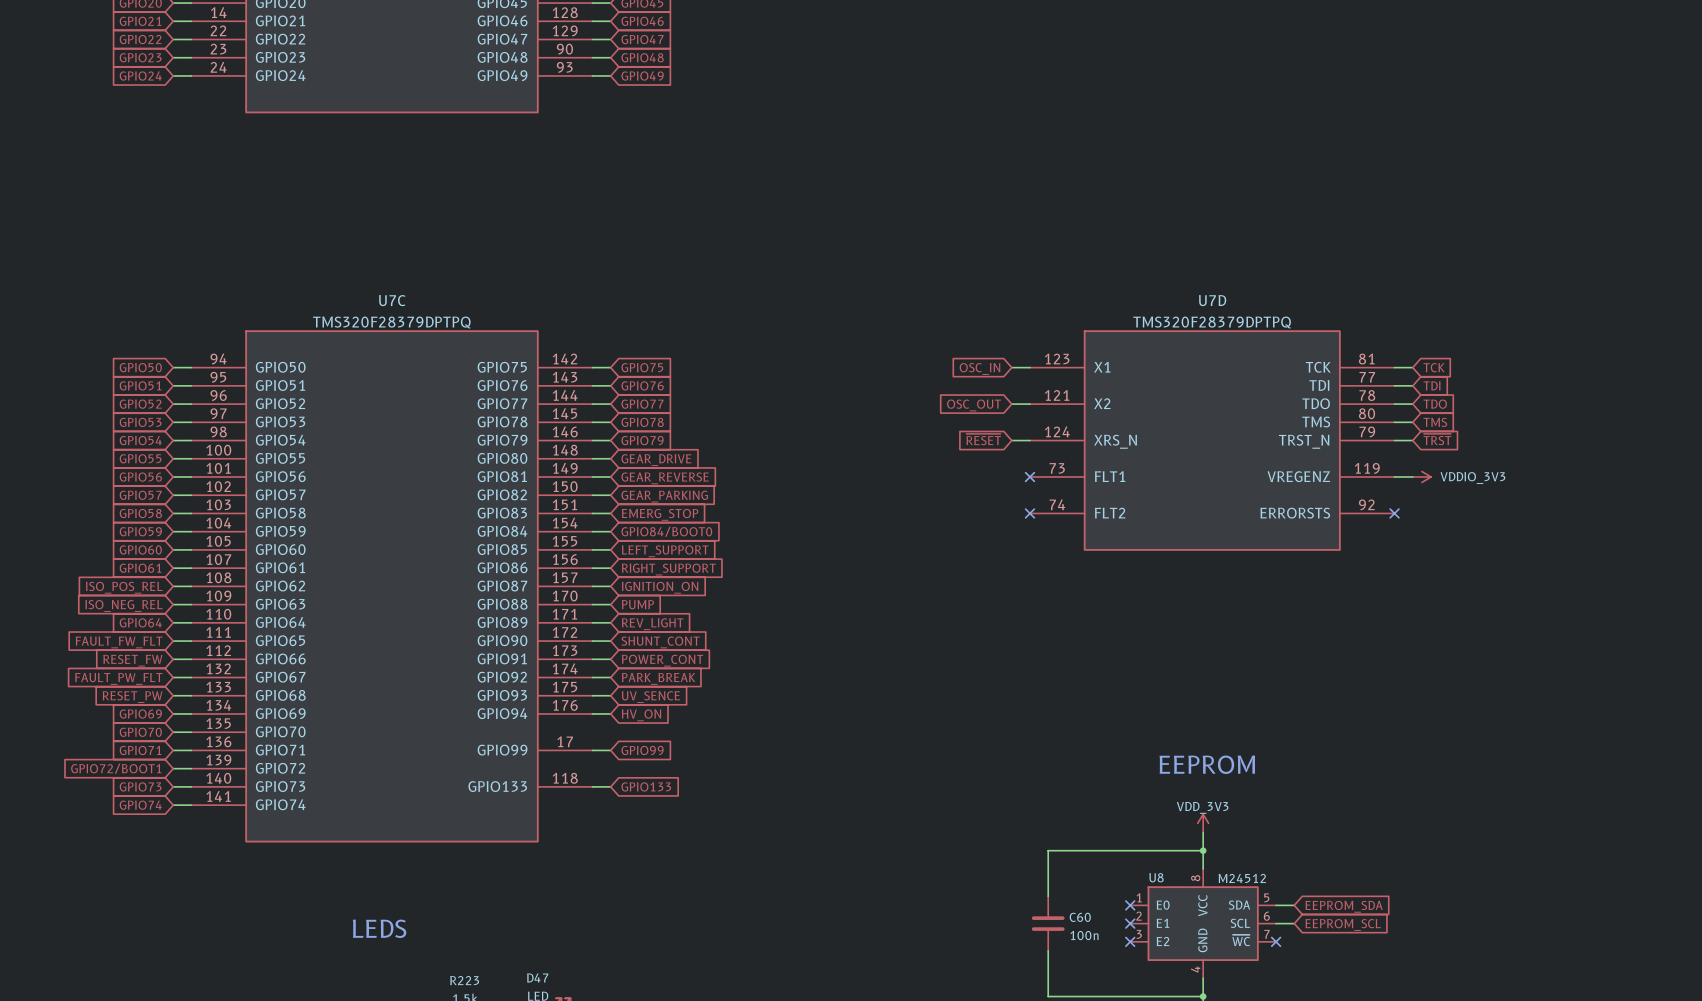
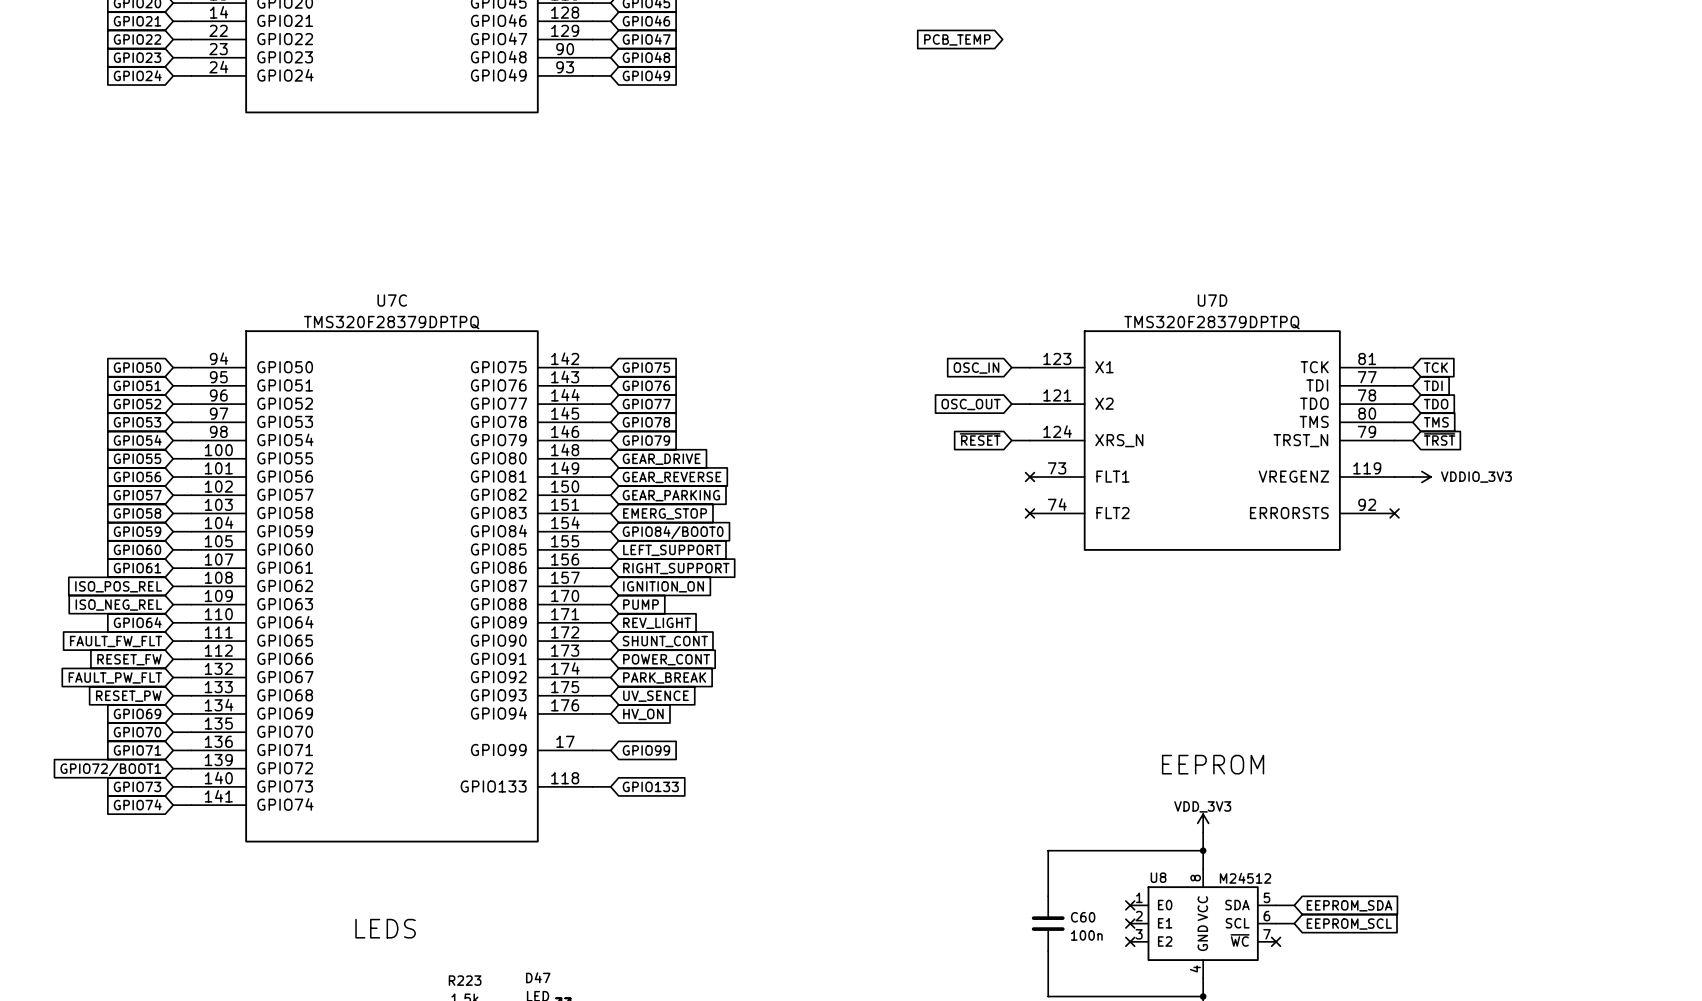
global label: none -> PCB_TEMP (957, 39)

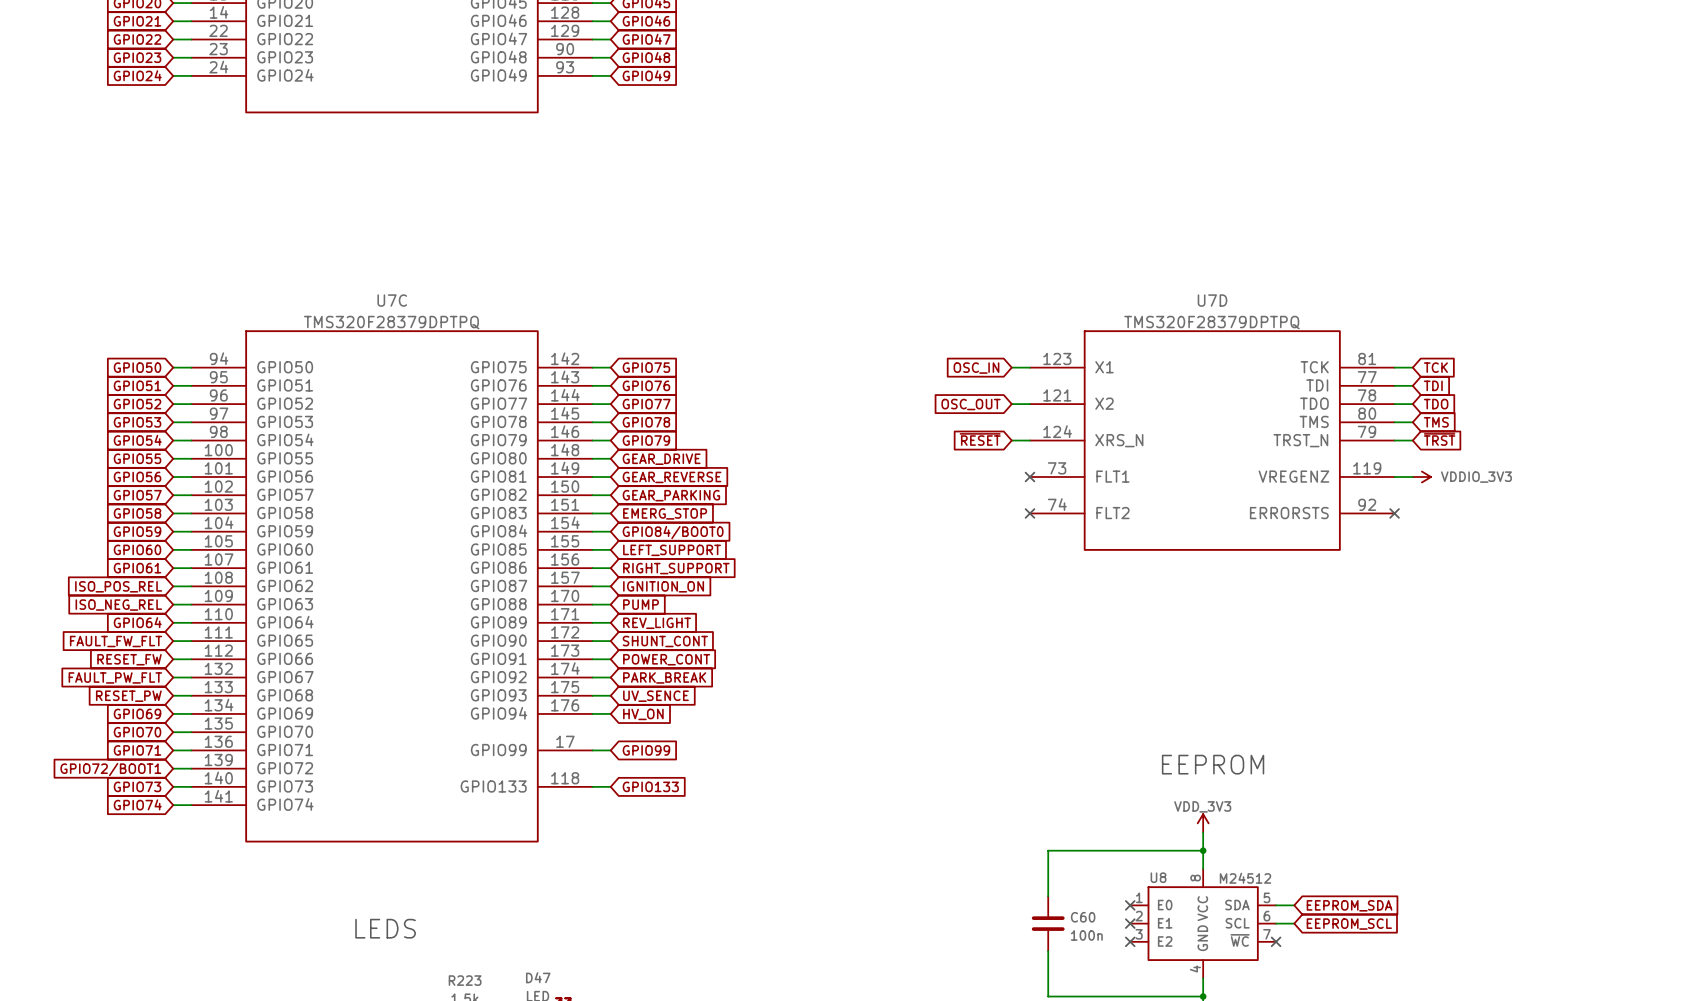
global label: PCB_TEMP (957, 39) -> none

